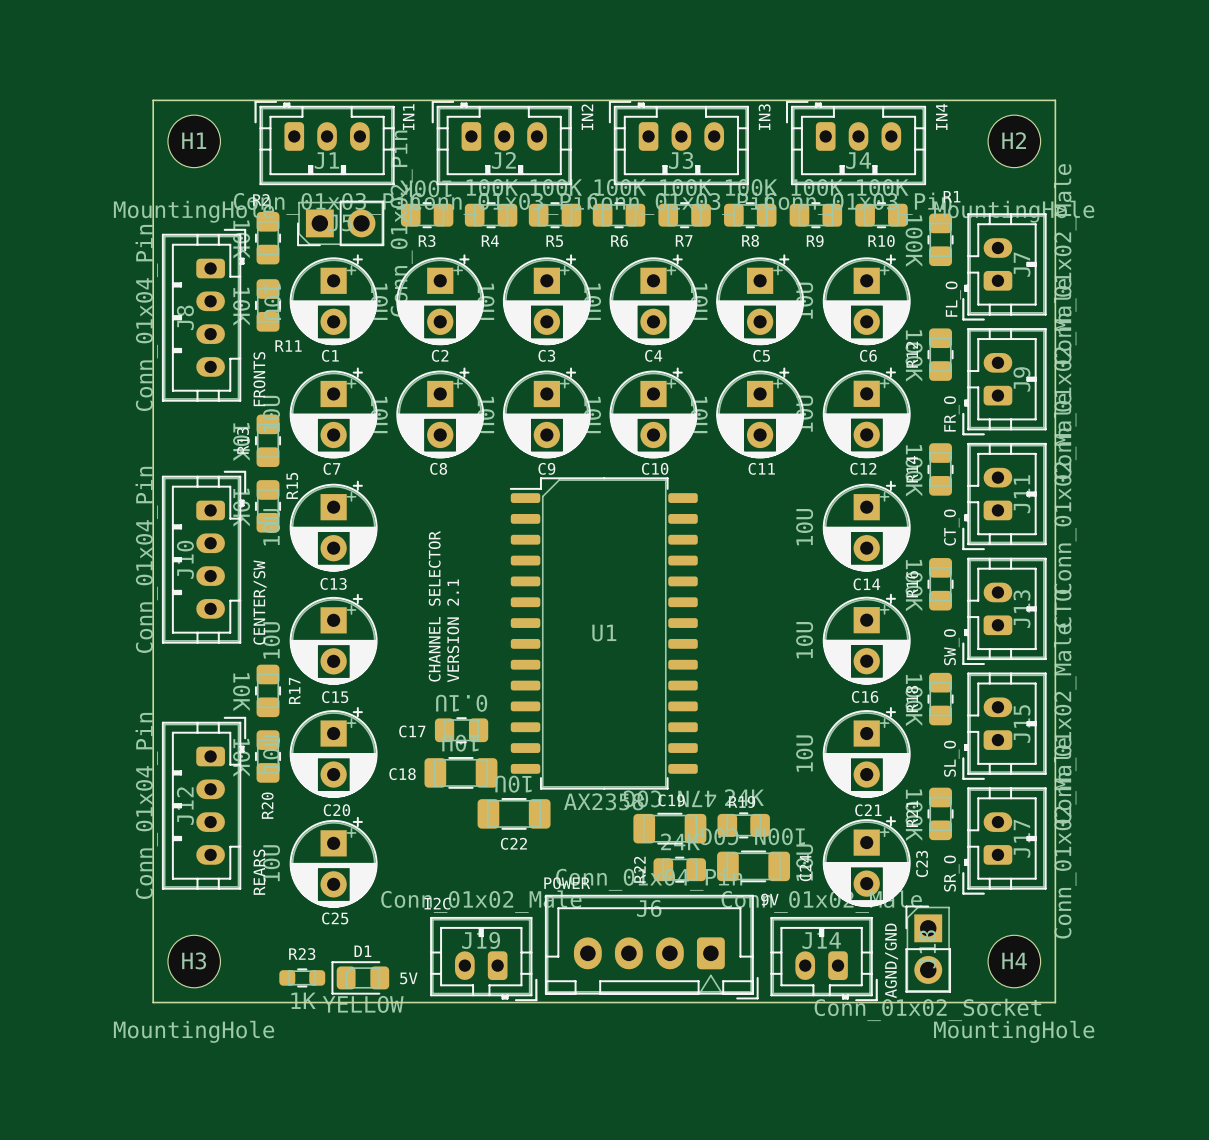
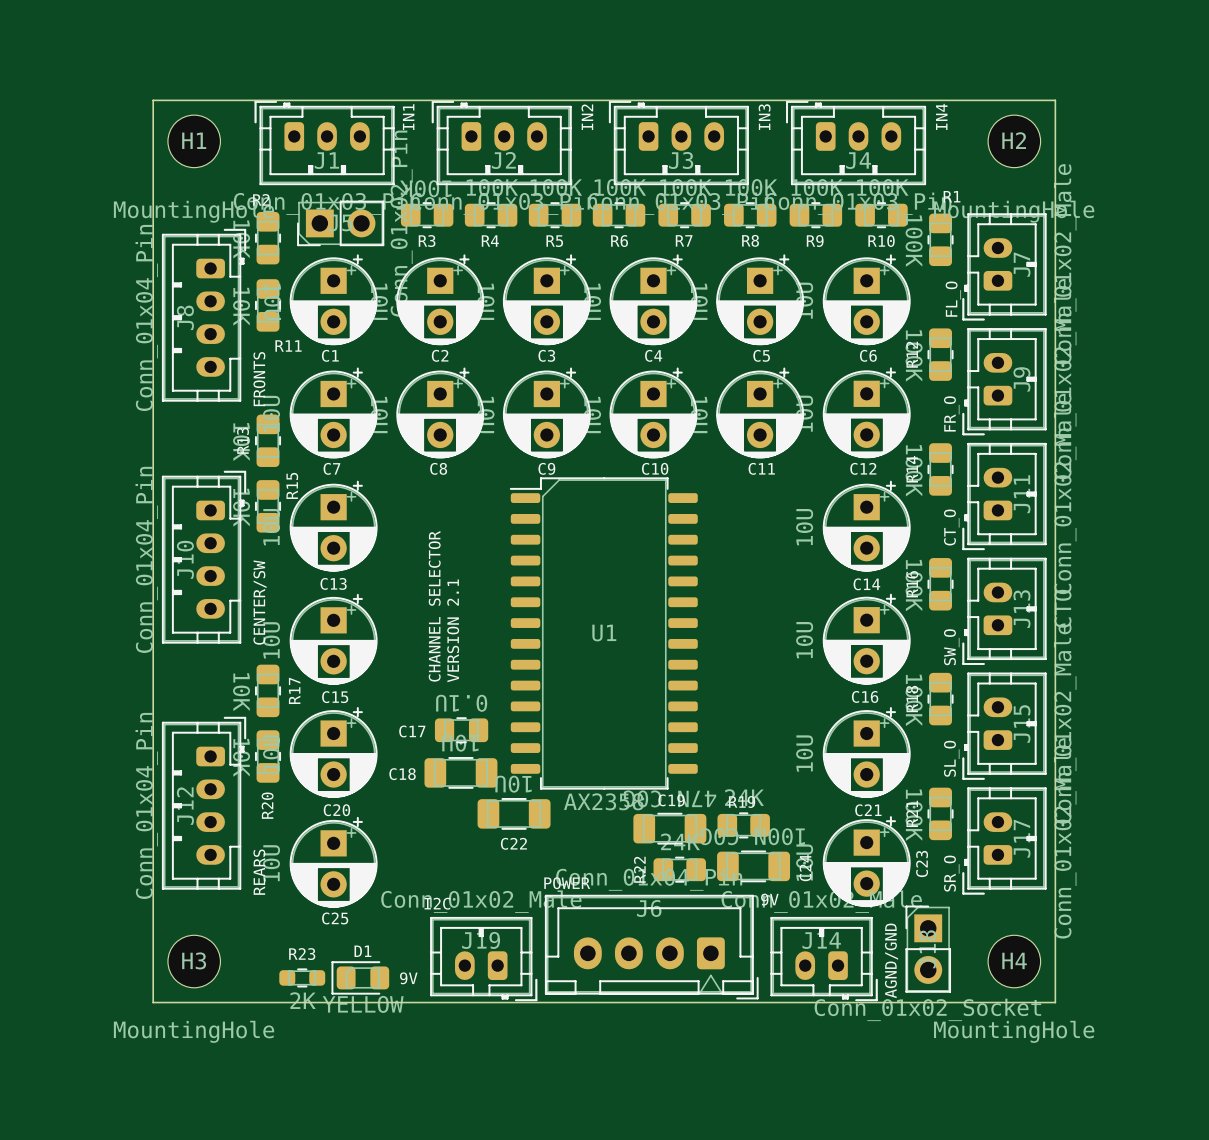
text: 5V (408, 978) -> 9V (408, 978)
R23 value: 1K (303, 1000) -> 2K (303, 1000)

